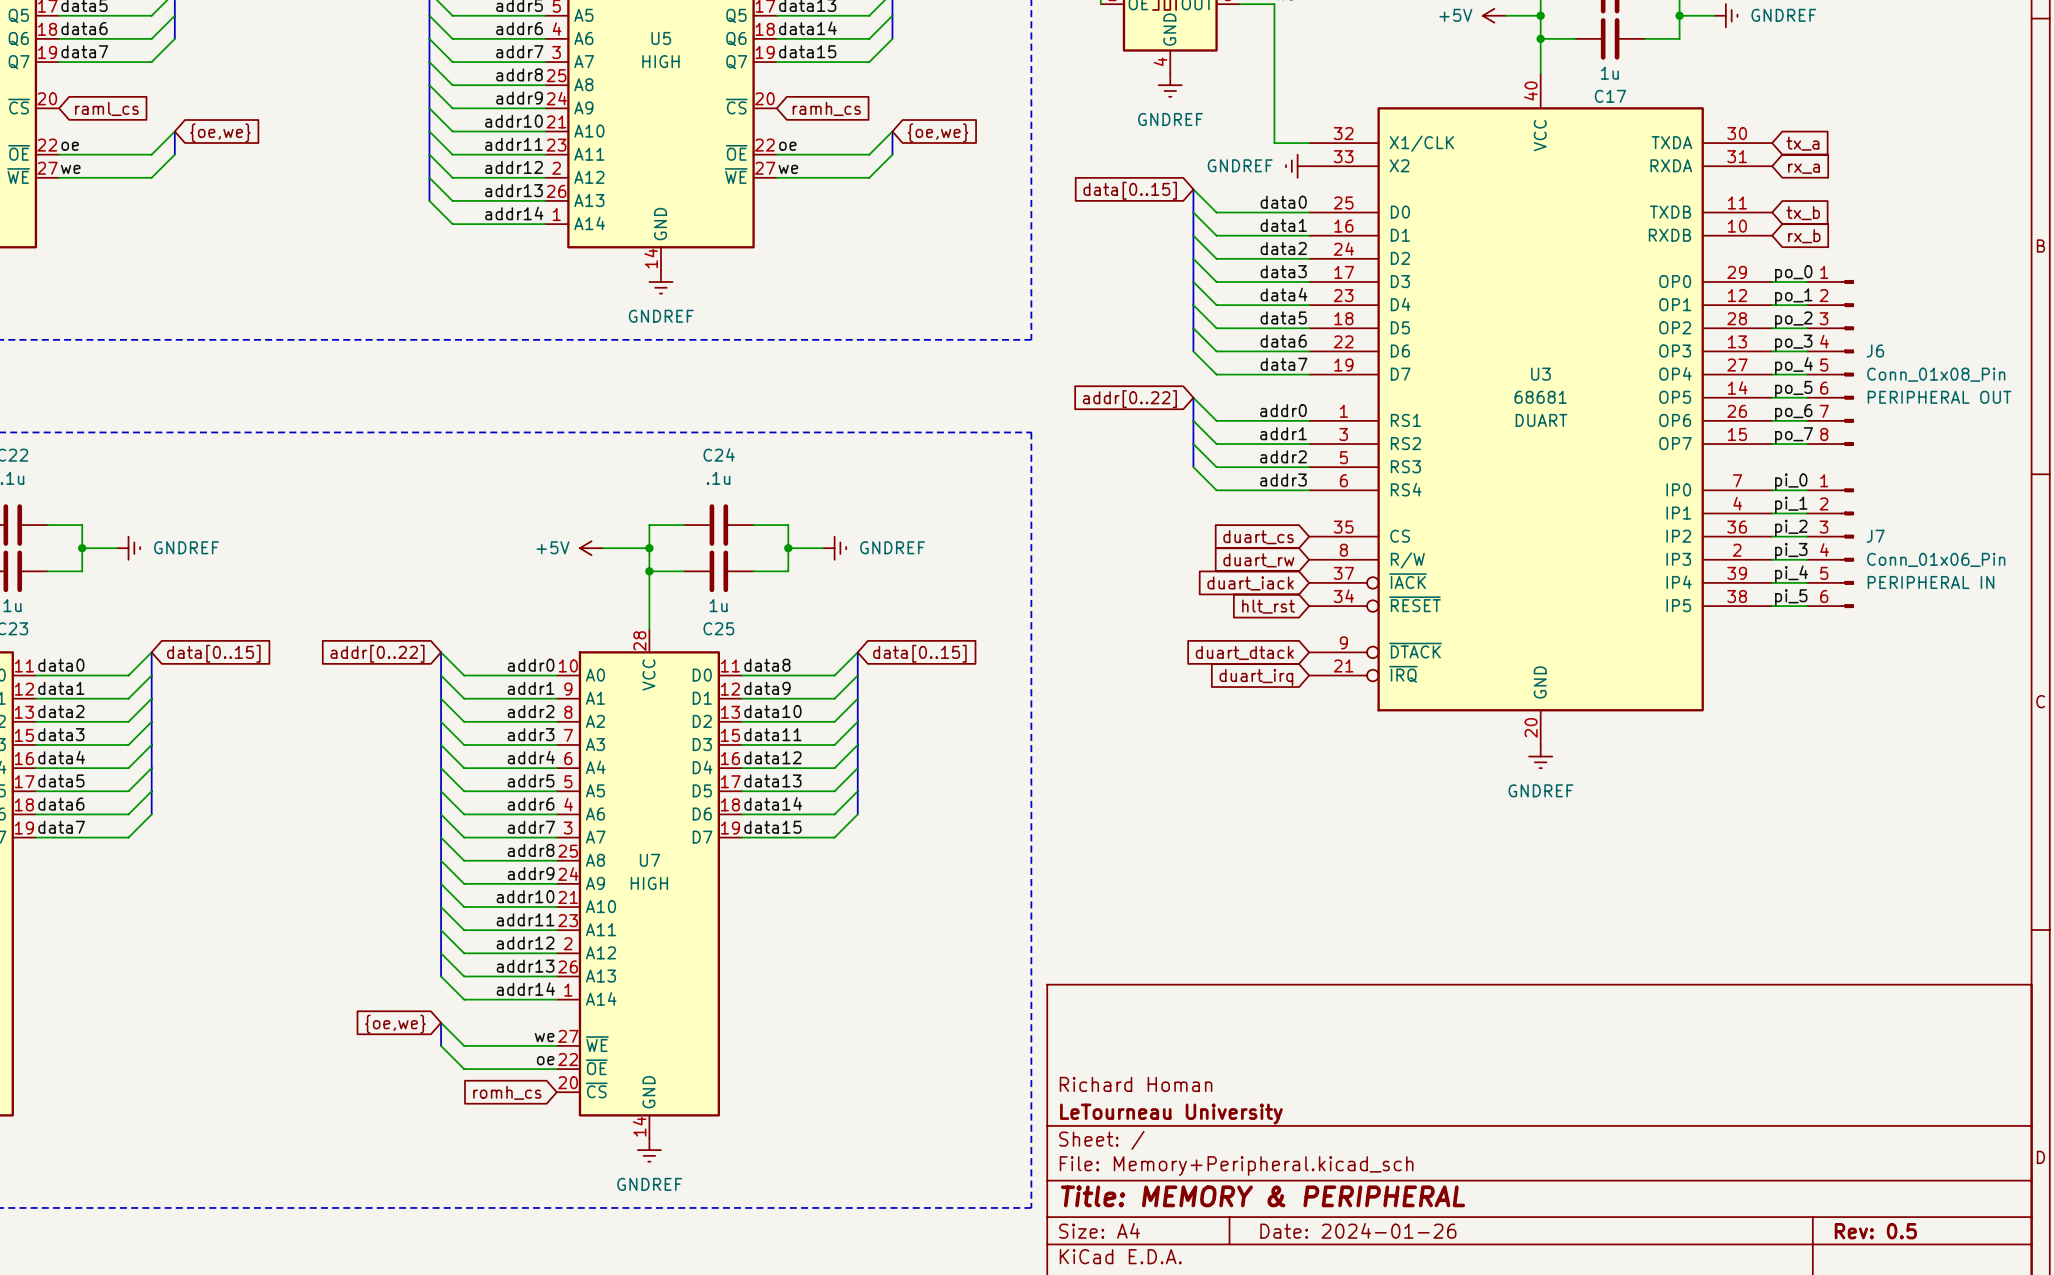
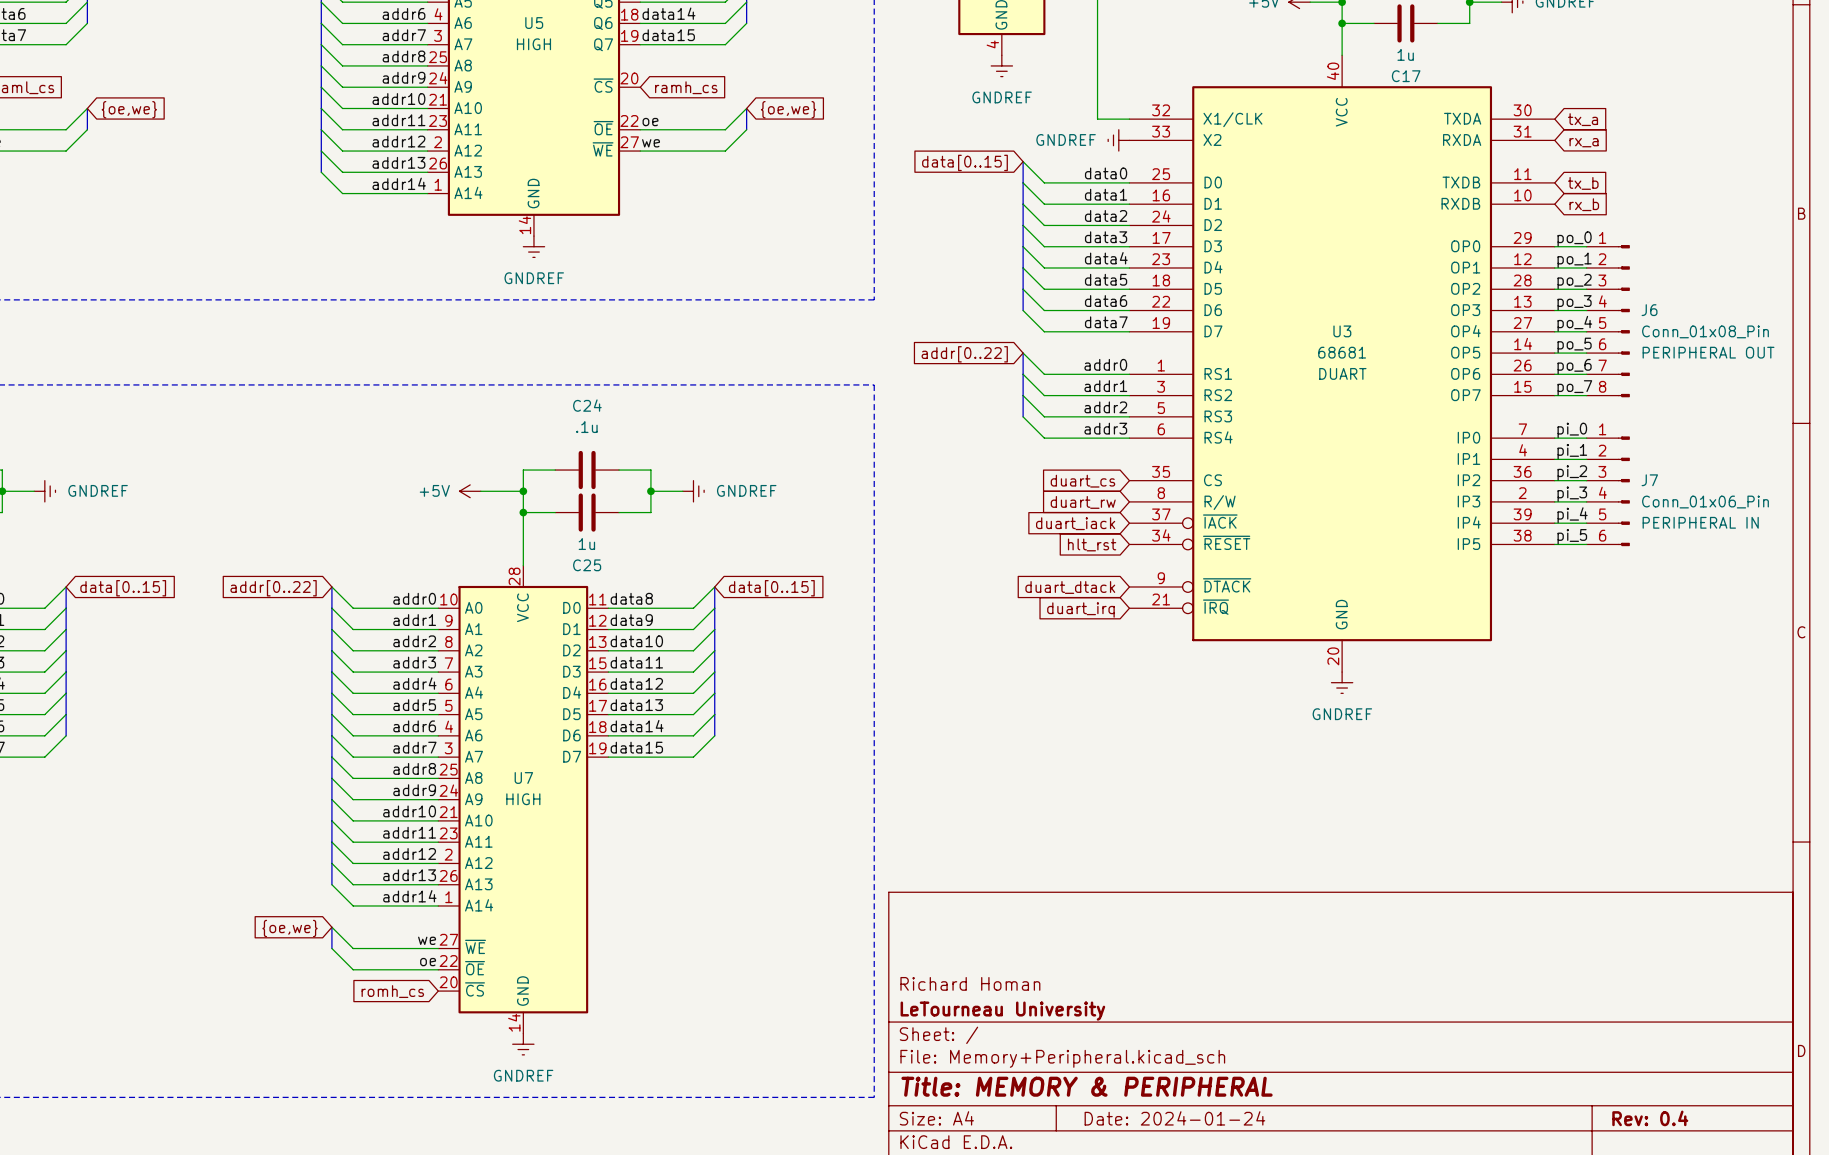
title block: Date: 2024-01-26 (1358, 1230) -> Date: 2024-01-24 (1174, 1118)
title block: Rev: 0.5 (1875, 1231) -> Rev: 0.4 (1650, 1118)

